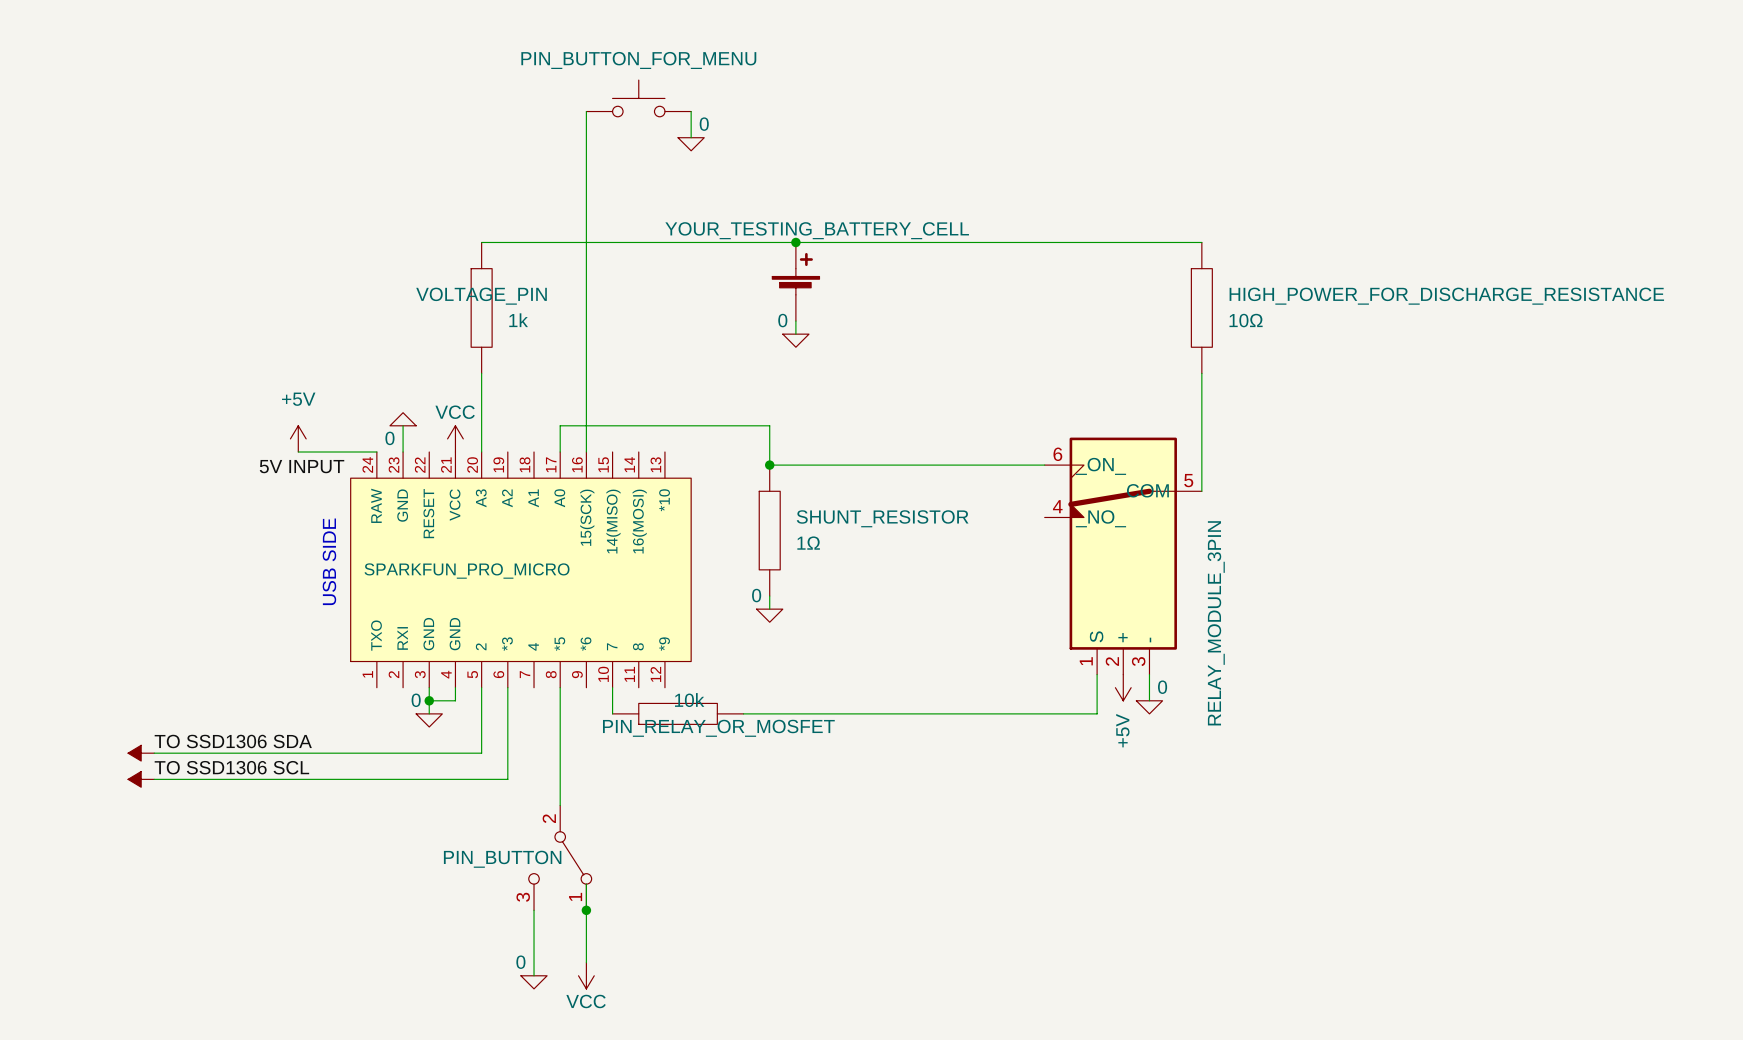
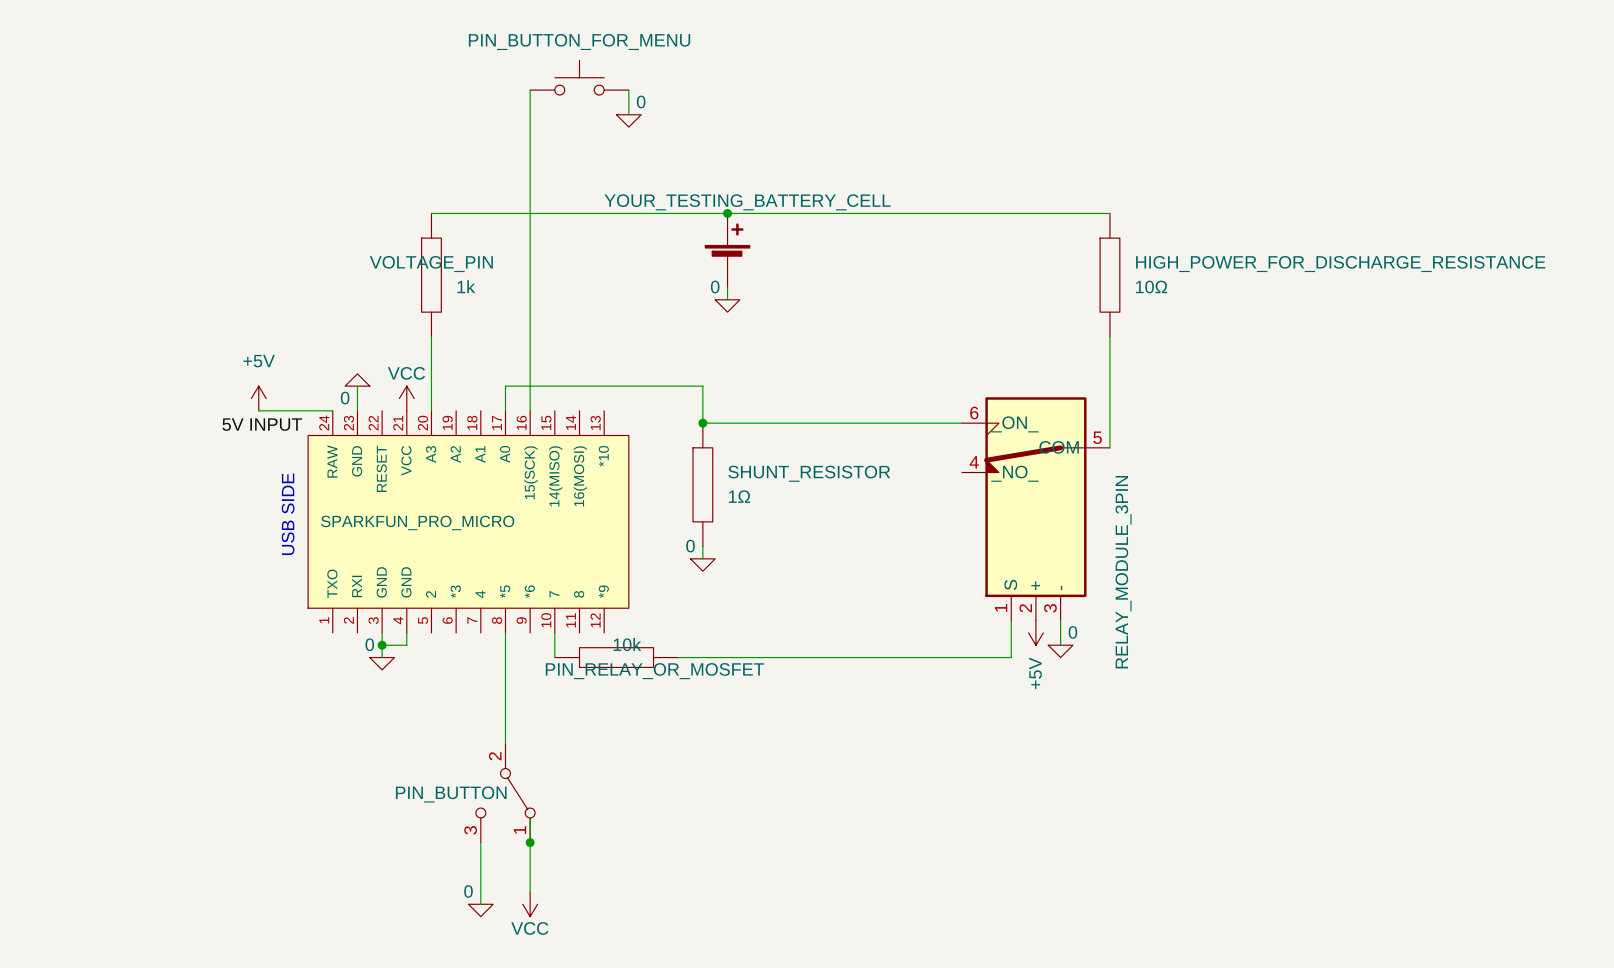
wire: (481, 687) (481, 753) (154, 753) -> none
wire: (507, 687) (507, 779) (154, 779) -> none
label: TO SSD1306 SDA (233, 741) -> none
power symbol: (141, 753) -> none
label: TO SSD1306 SCL (231, 767) -> none
power symbol: (141, 779) -> none

